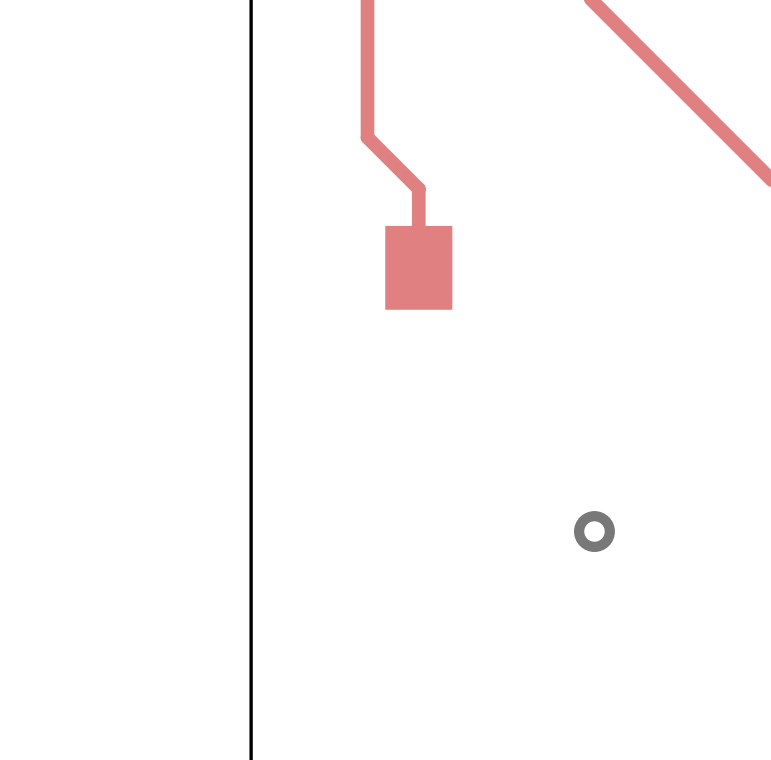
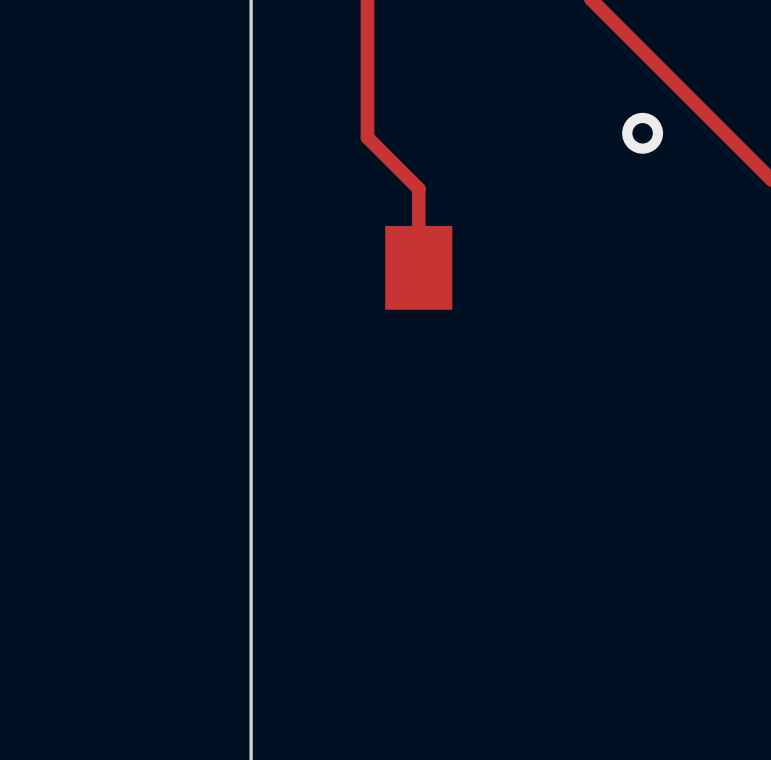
via position: (594, 531) -> (642, 133)

